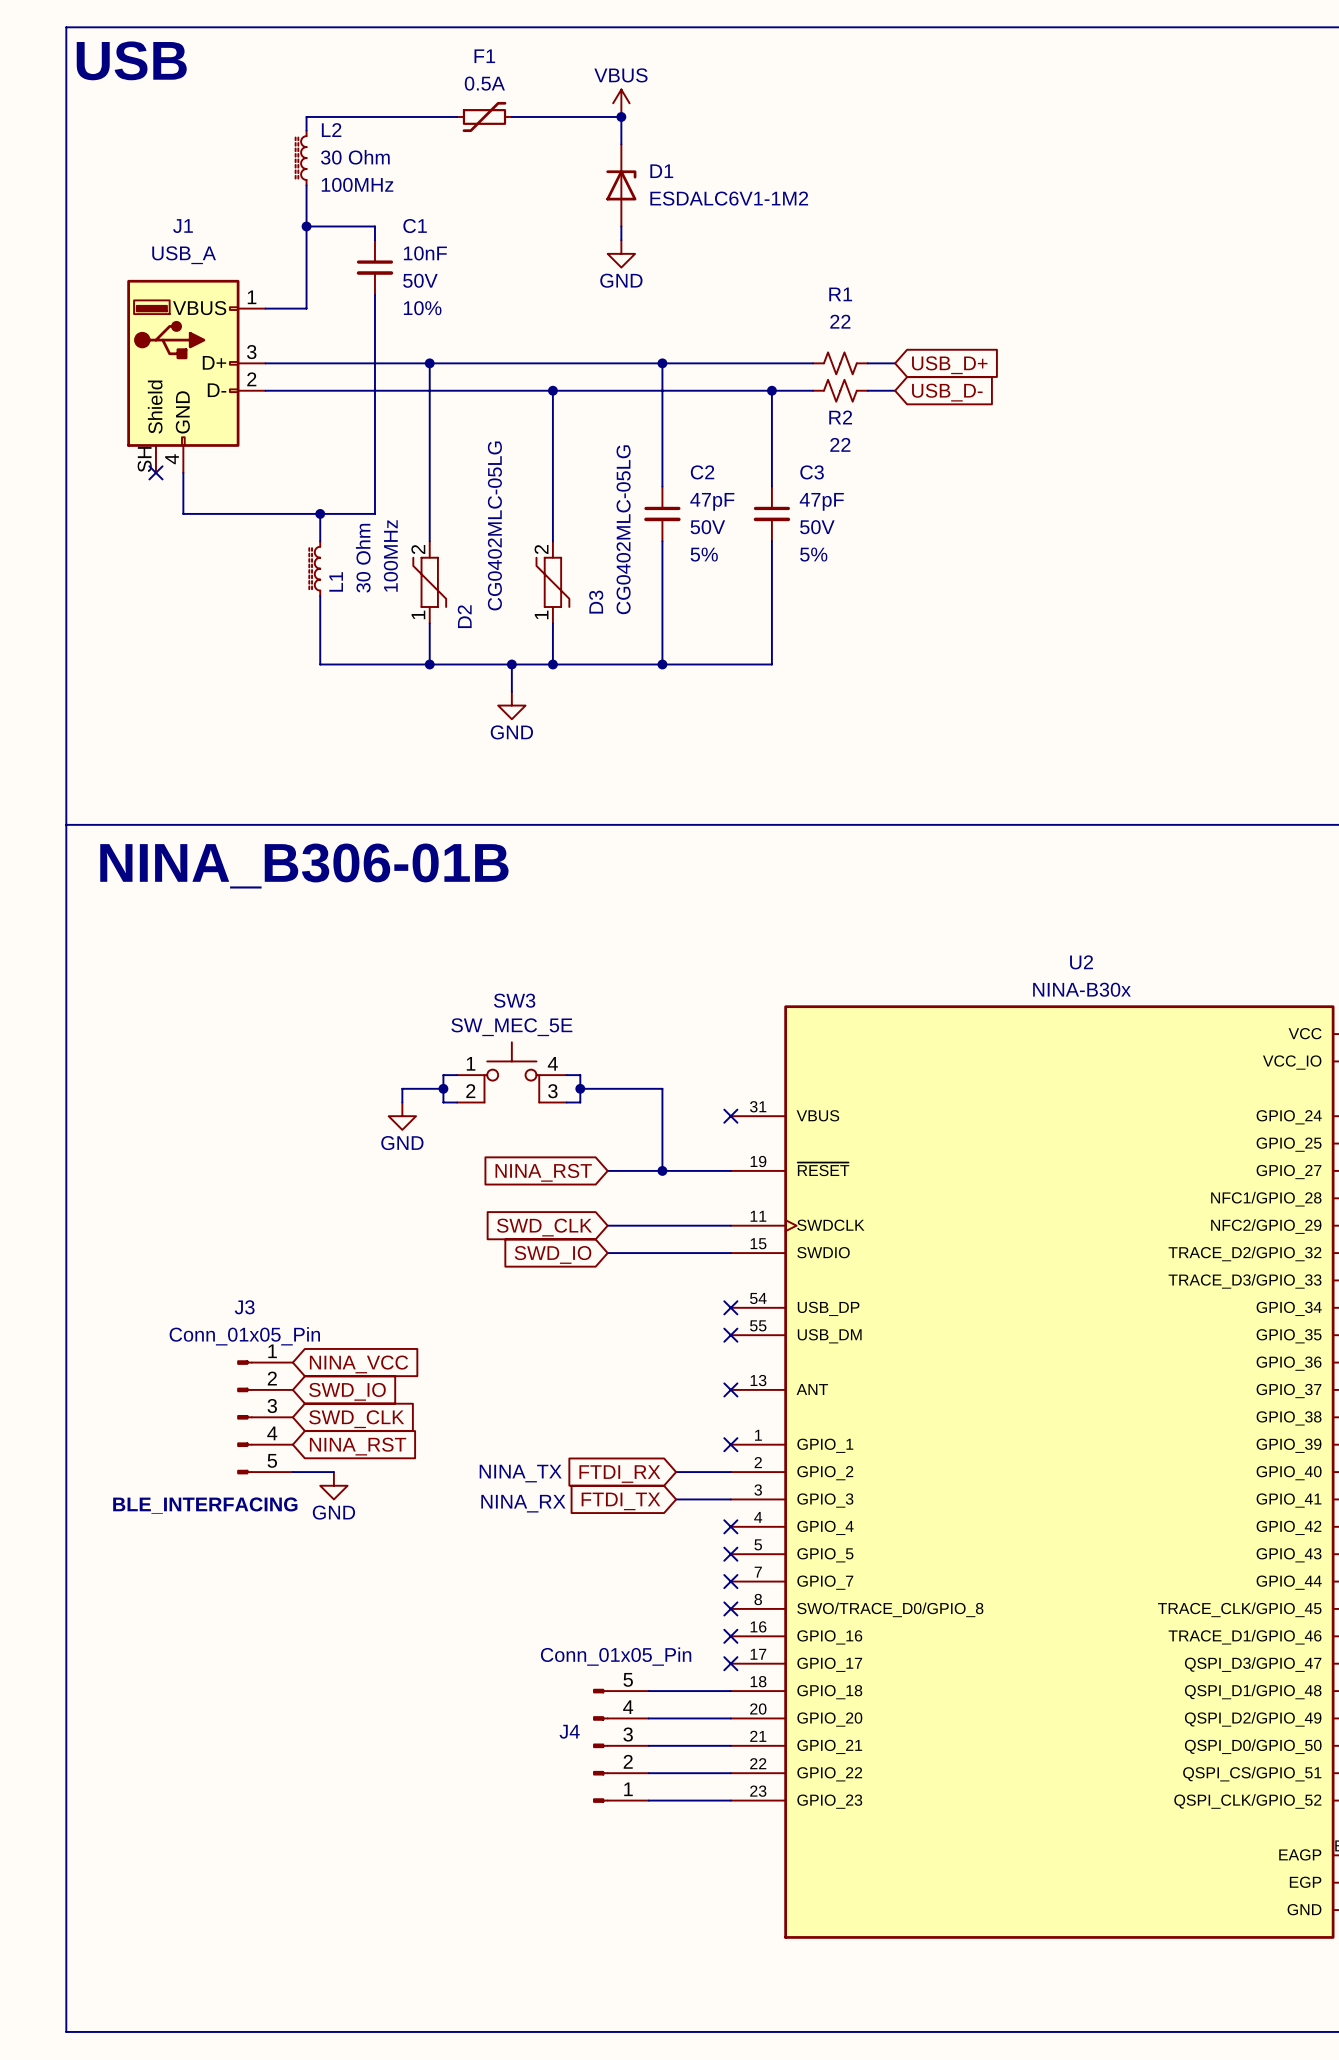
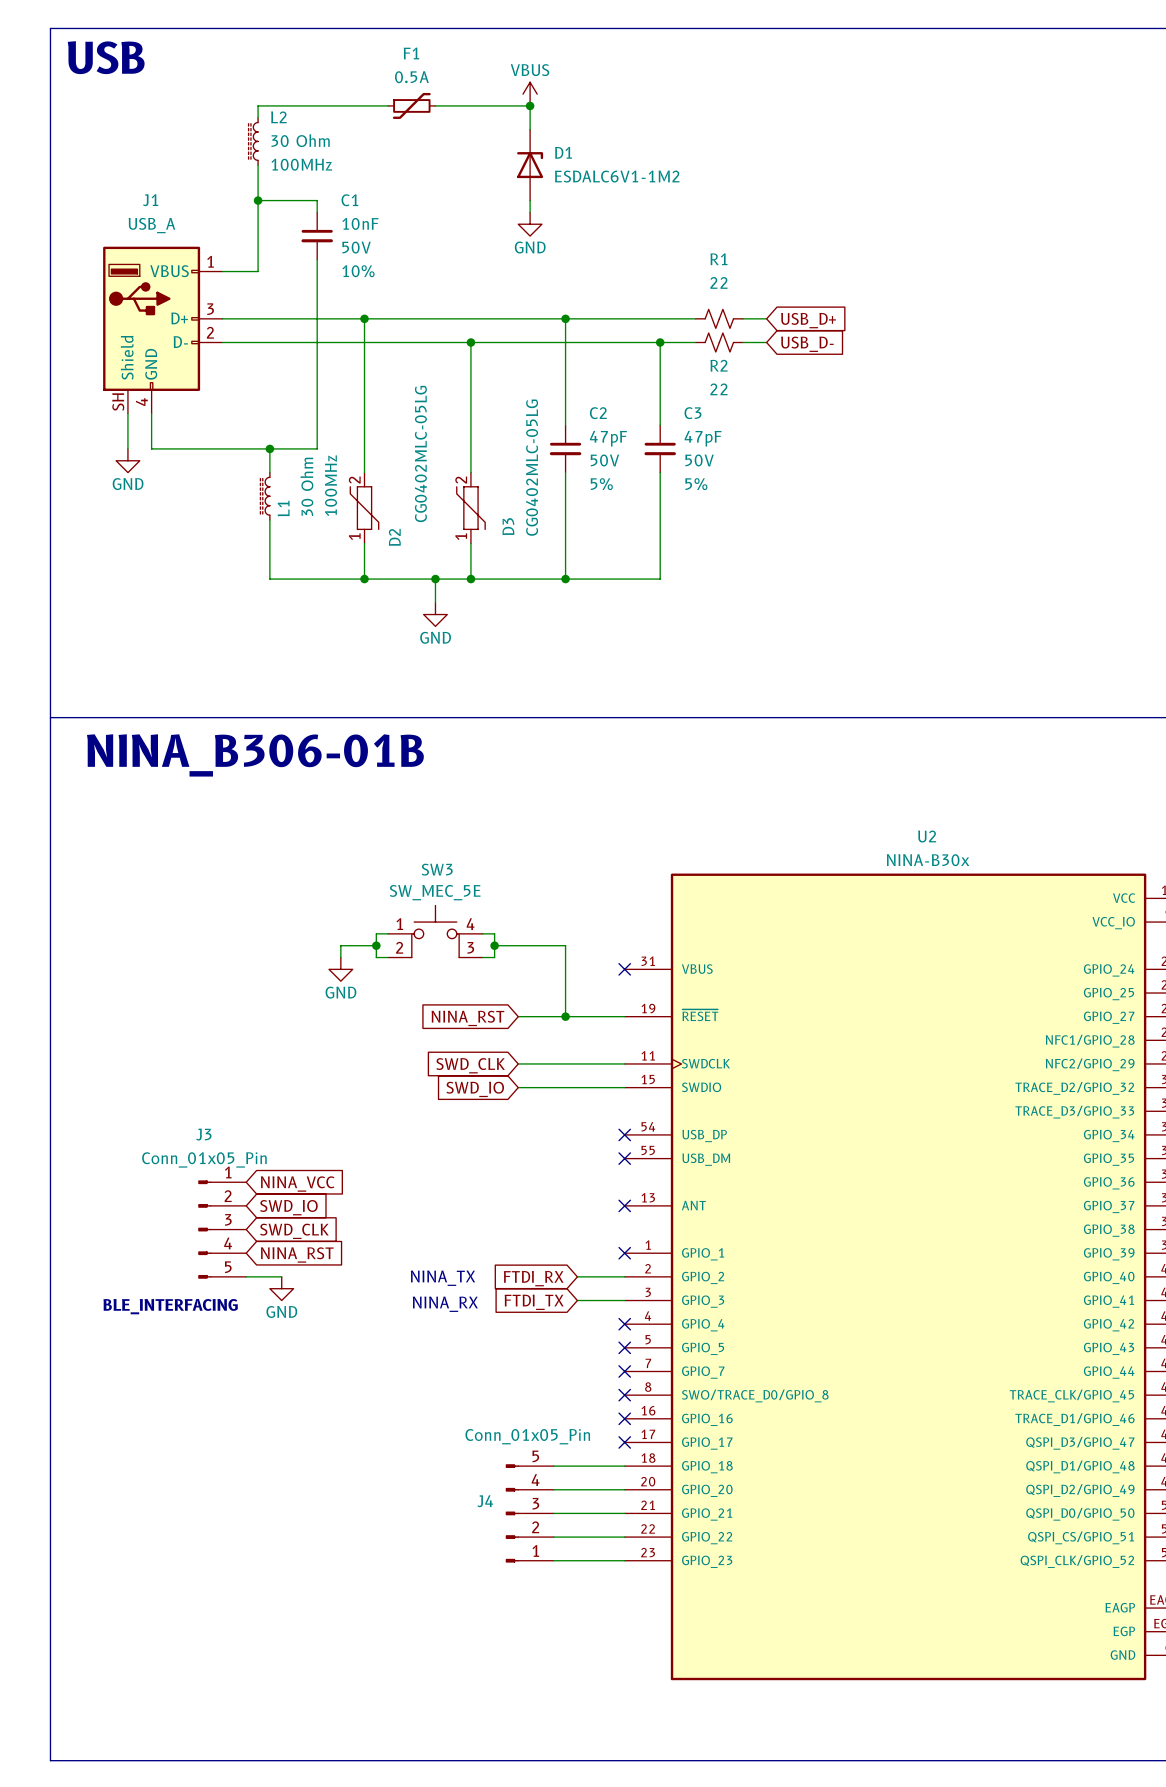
wire: none -> (127, 413) (127, 448)
no-connect mark: (155, 472) -> none
power symbol: none -> GND (127, 460)

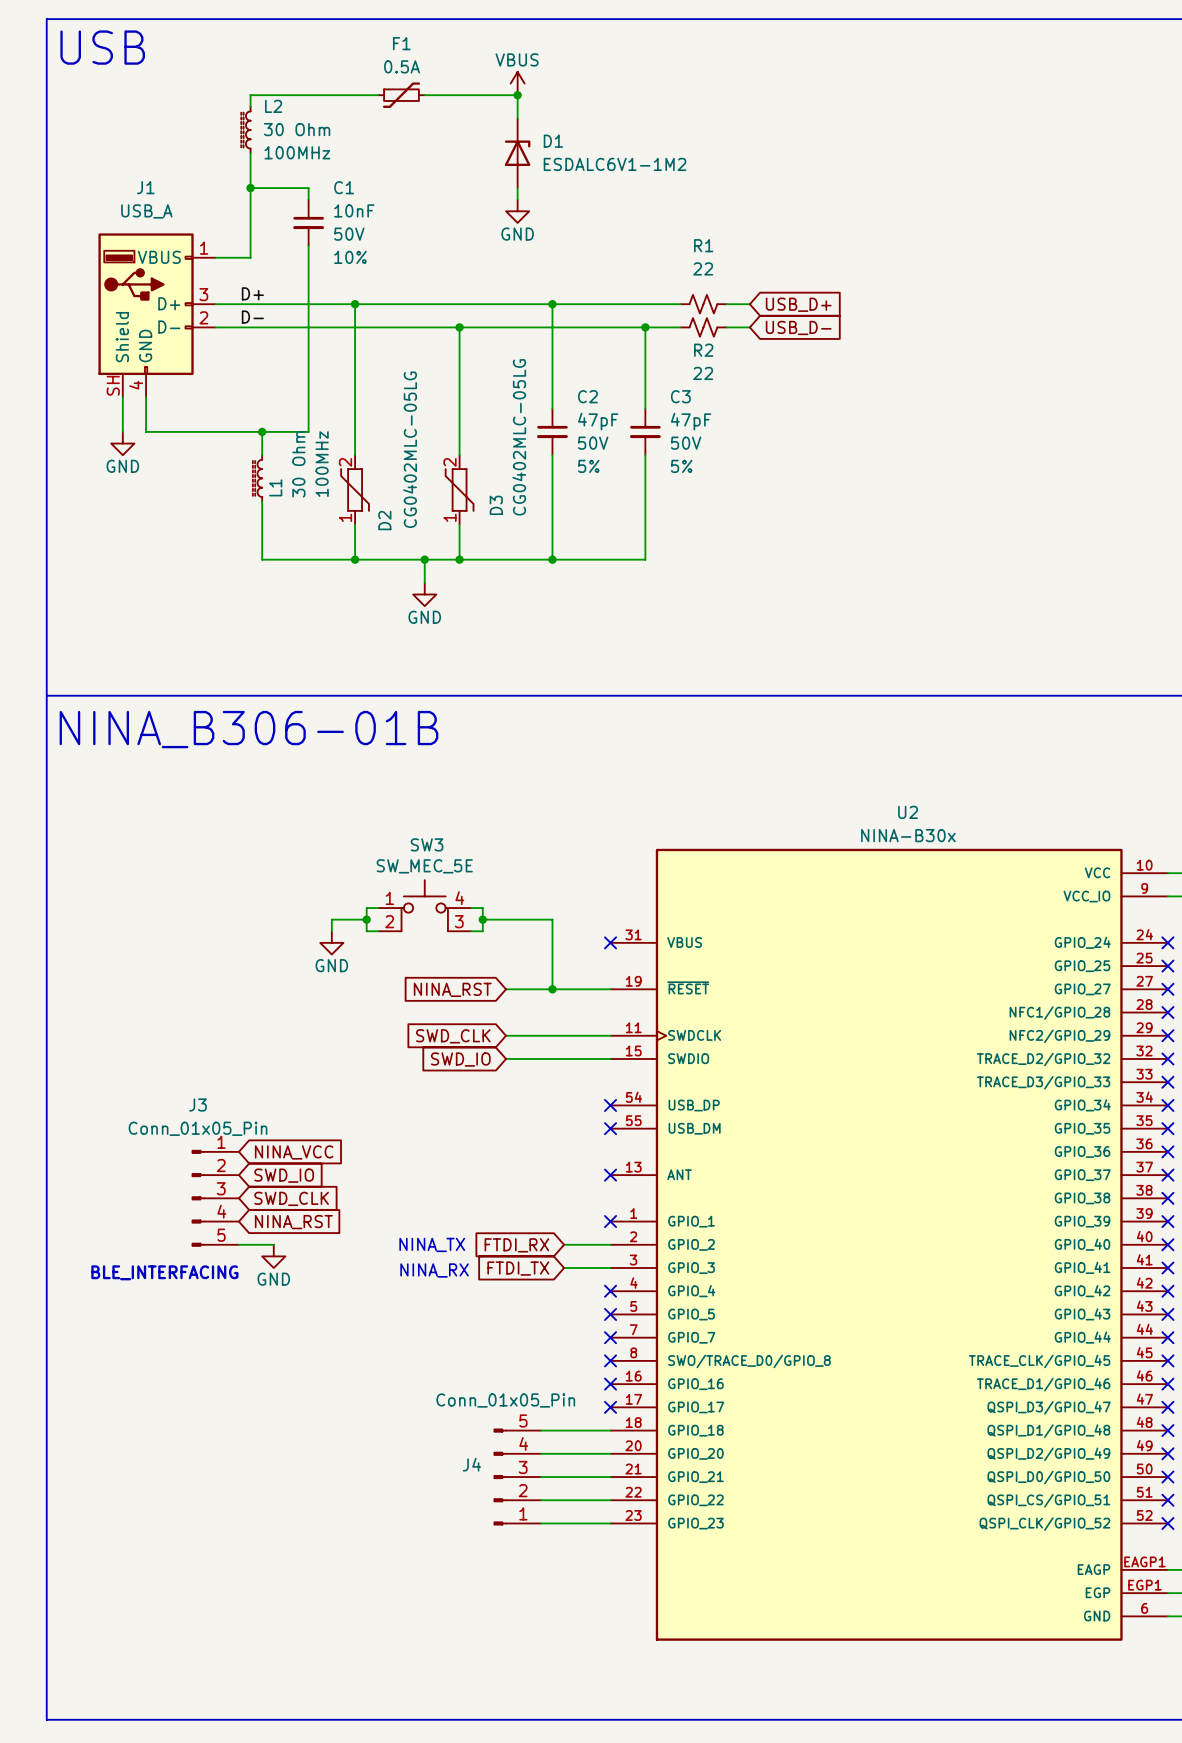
label: none -> D+ (252, 293)
label: none -> D- (252, 317)

